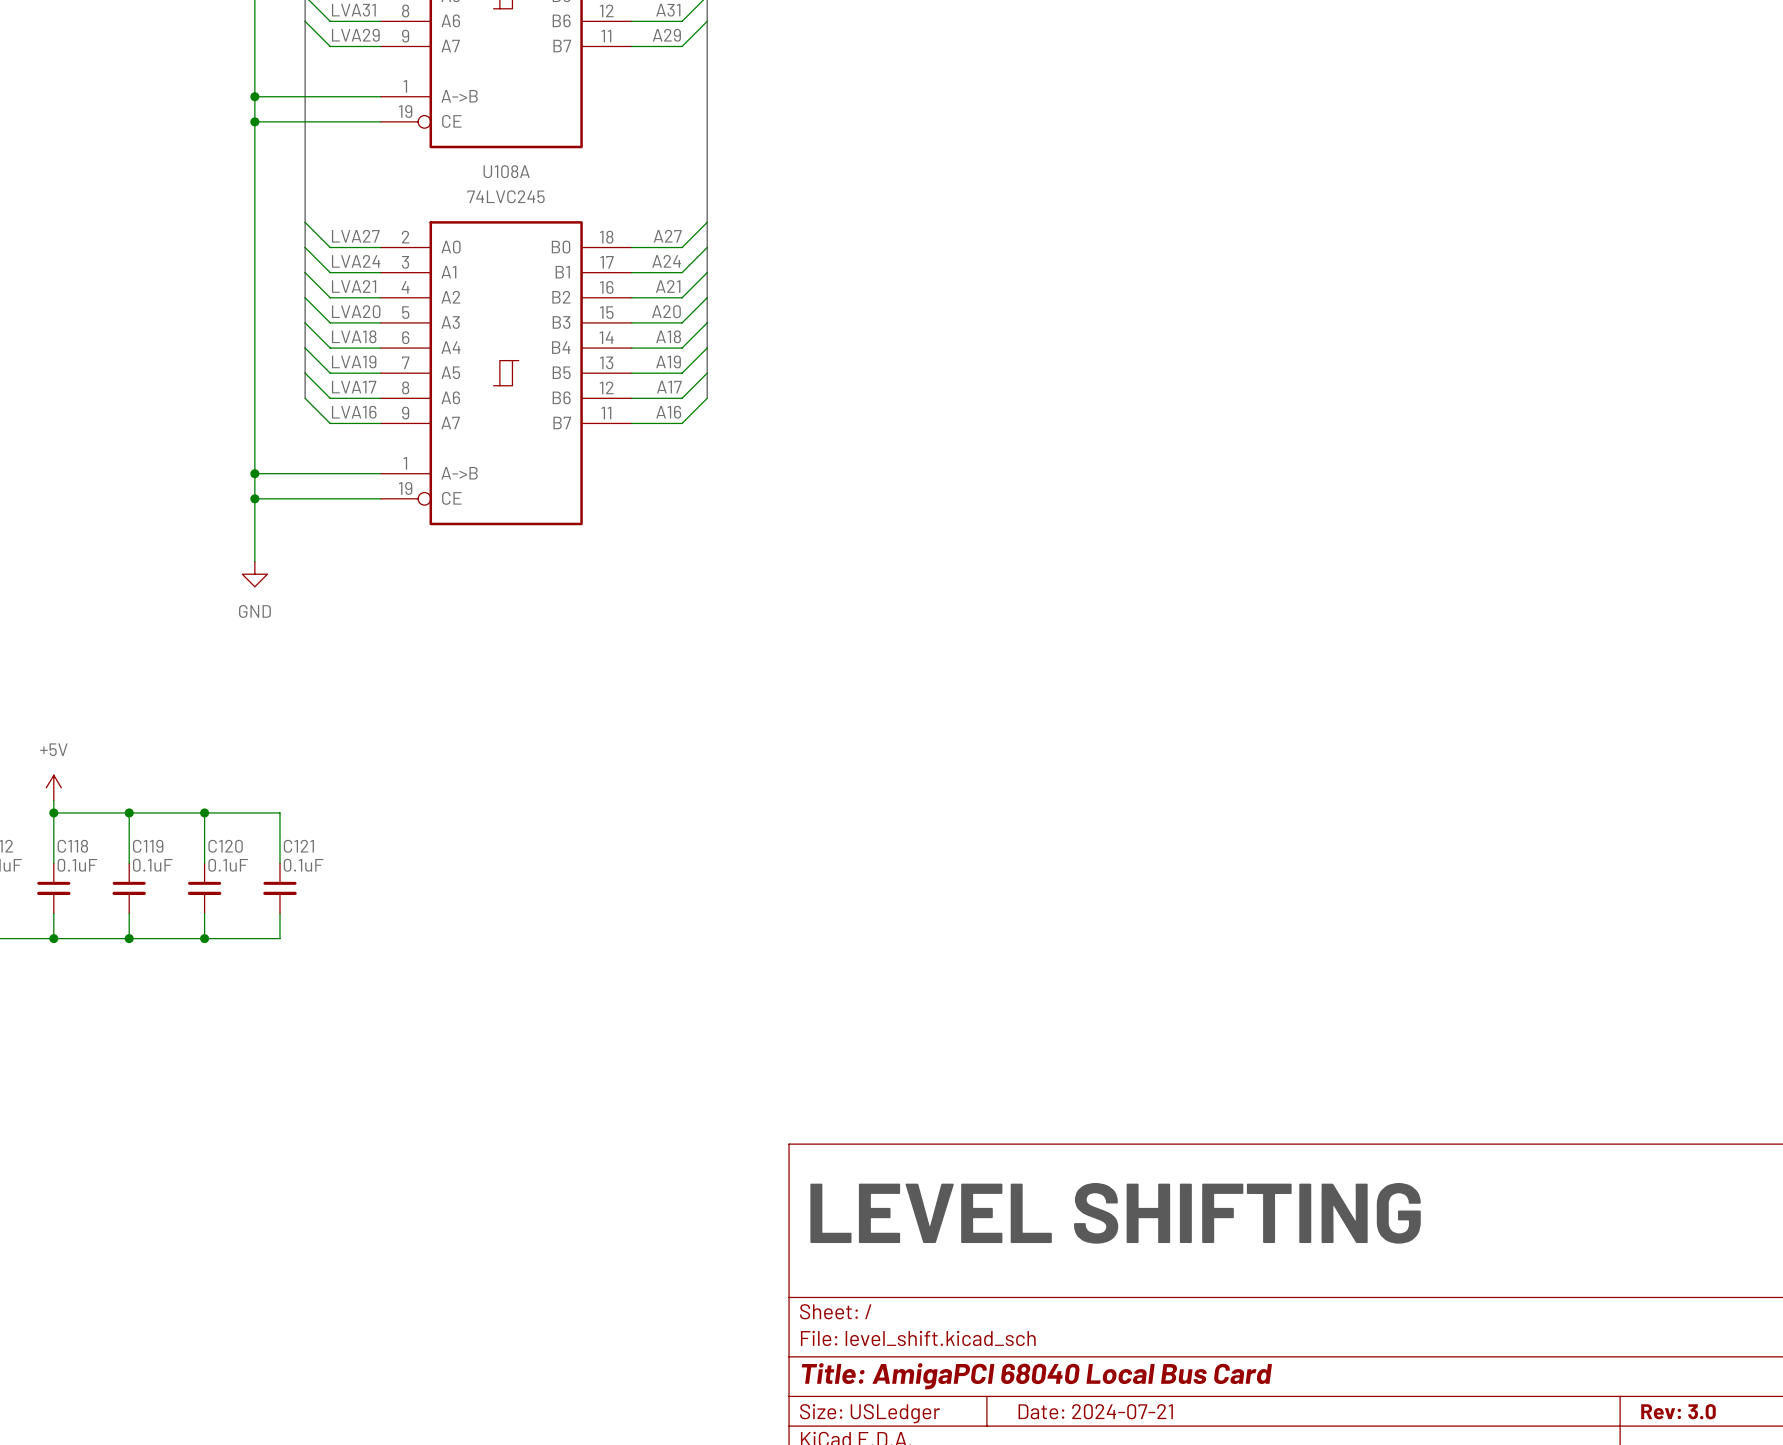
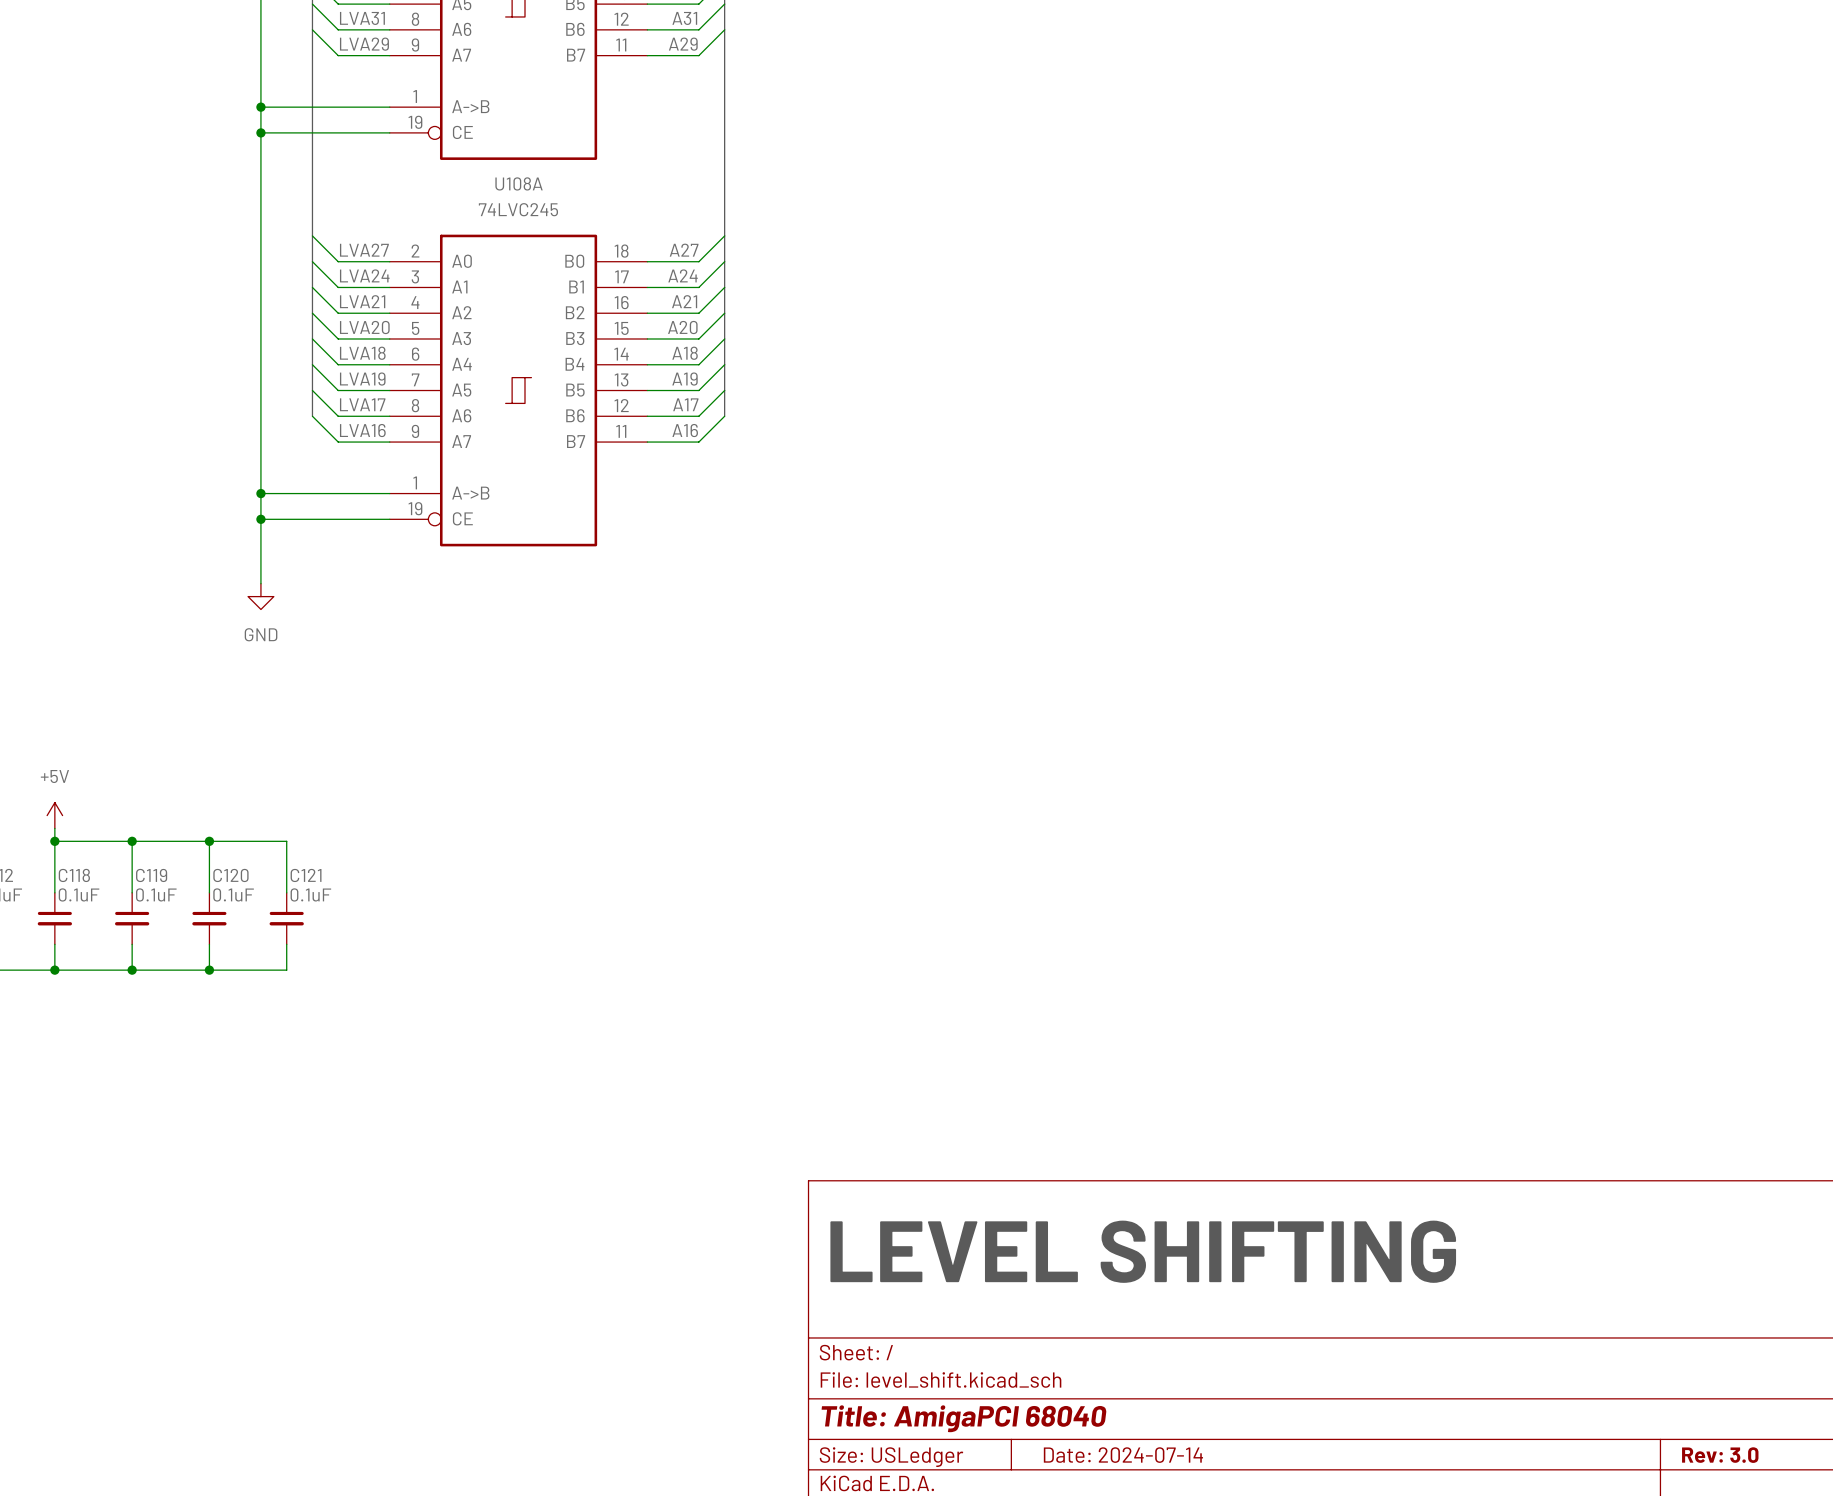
title block: Title: AmigaPCI 68040 Local Bus Card (1036, 1376) -> Title: AmigaPCI 68040 (964, 1418)
title block: Date: 2024-07-21 (1095, 1411) -> Date: 2024-07-14 (1123, 1455)

